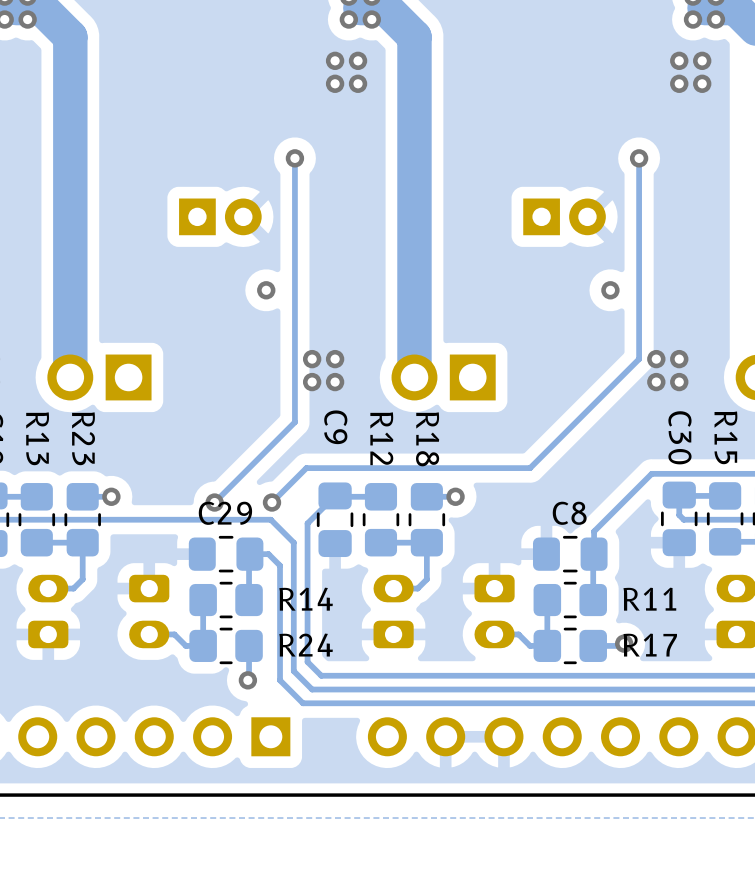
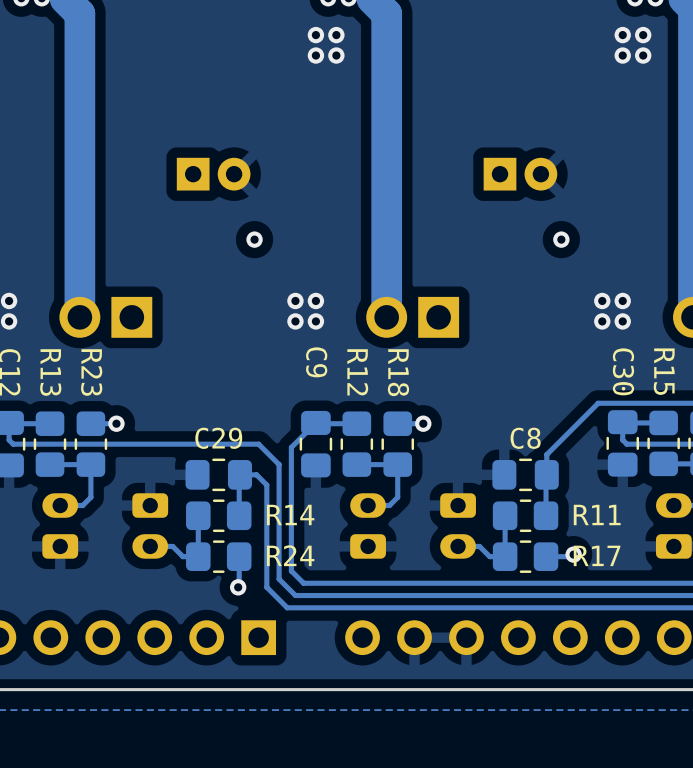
track: (294, 158) (294, 422) (214, 502) -> none
via: (294, 158) -> none
track: (639, 158) (639, 359) (530, 468) (306, 468) (271, 502) -> none
via: (639, 158) -> none
via: (214, 502) -> none
via: (271, 502) -> none

